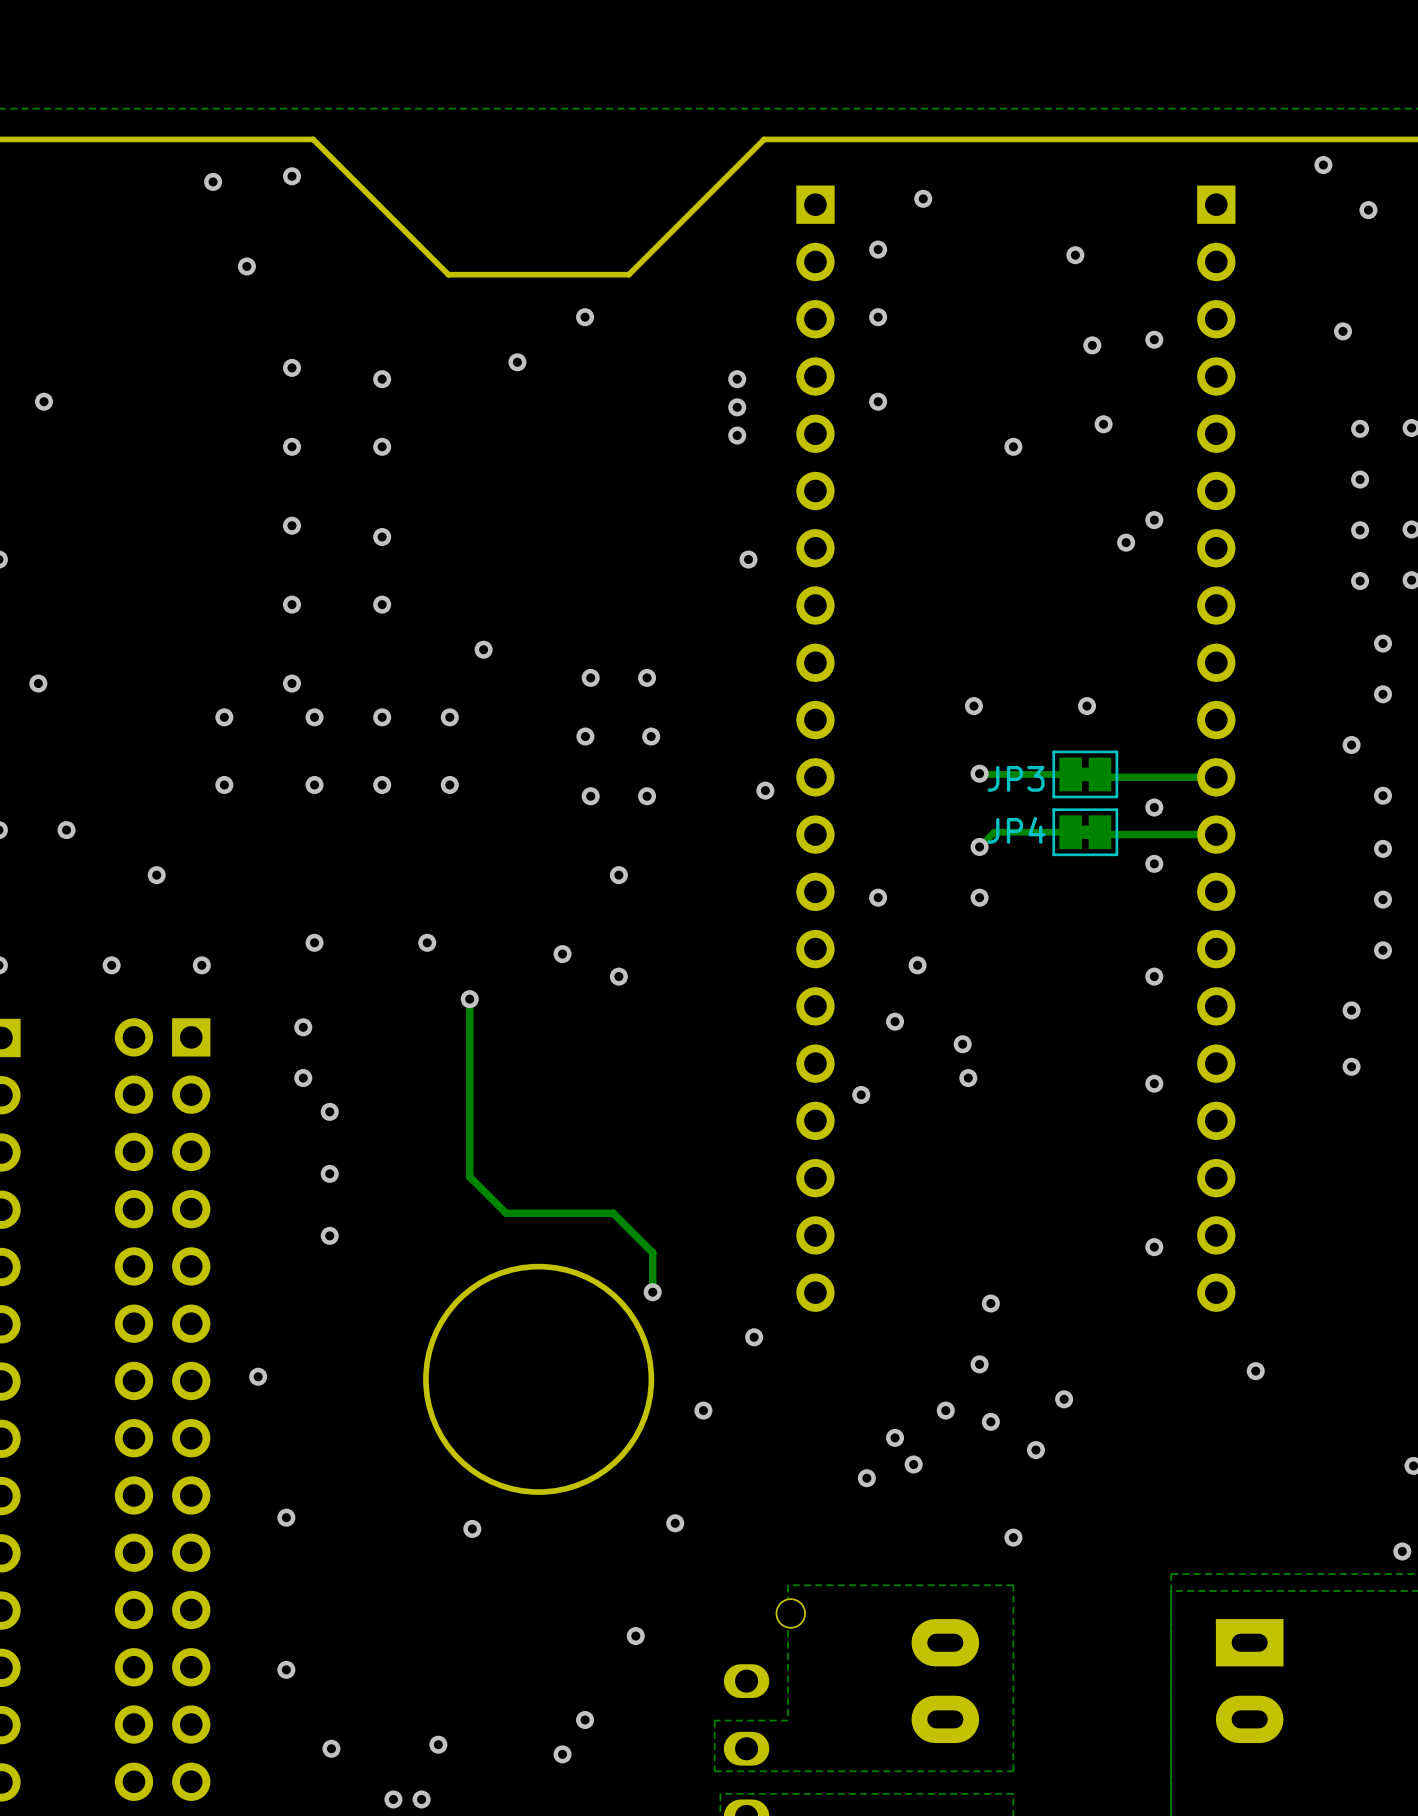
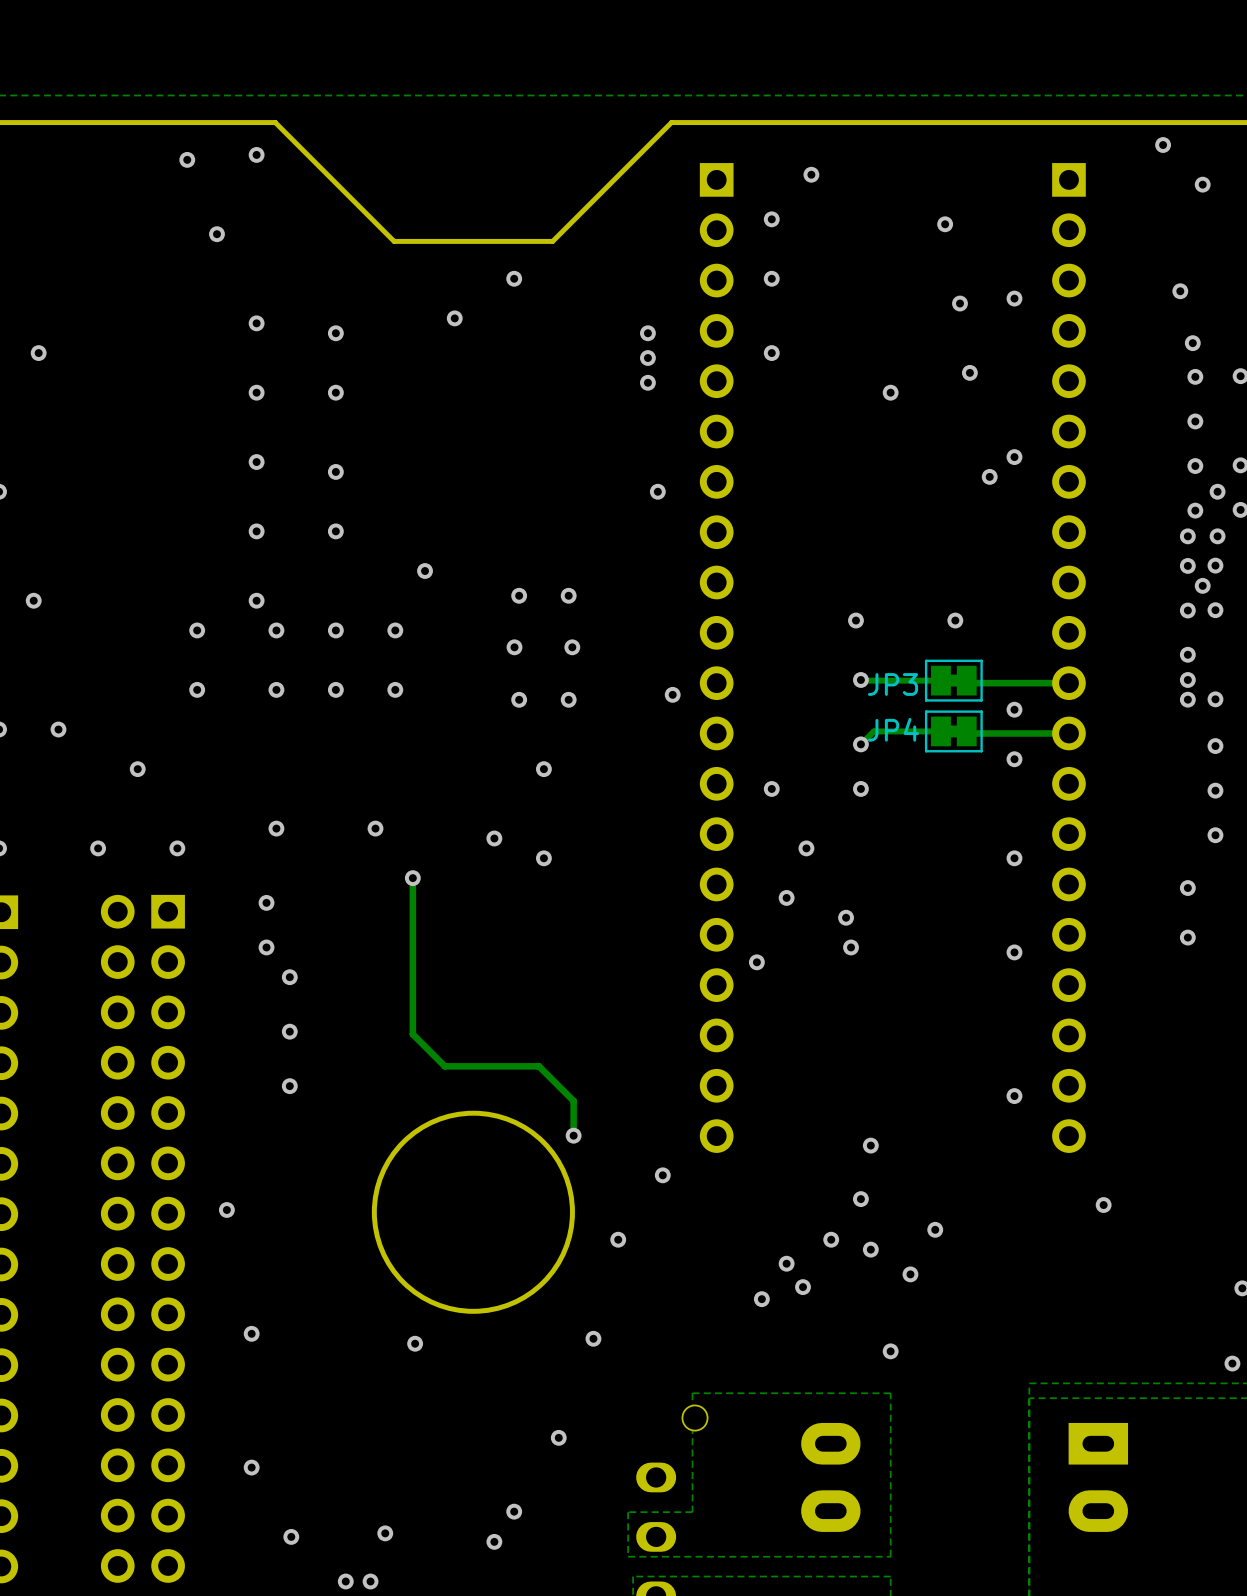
via: none -> (1192, 343)
via: none -> (1217, 491)
via: none -> (1187, 536)
via: none -> (1217, 536)
via: none -> (1187, 565)
via: none -> (1202, 585)
via: none -> (1187, 610)
via: none -> (1187, 679)
via: none -> (1187, 699)

